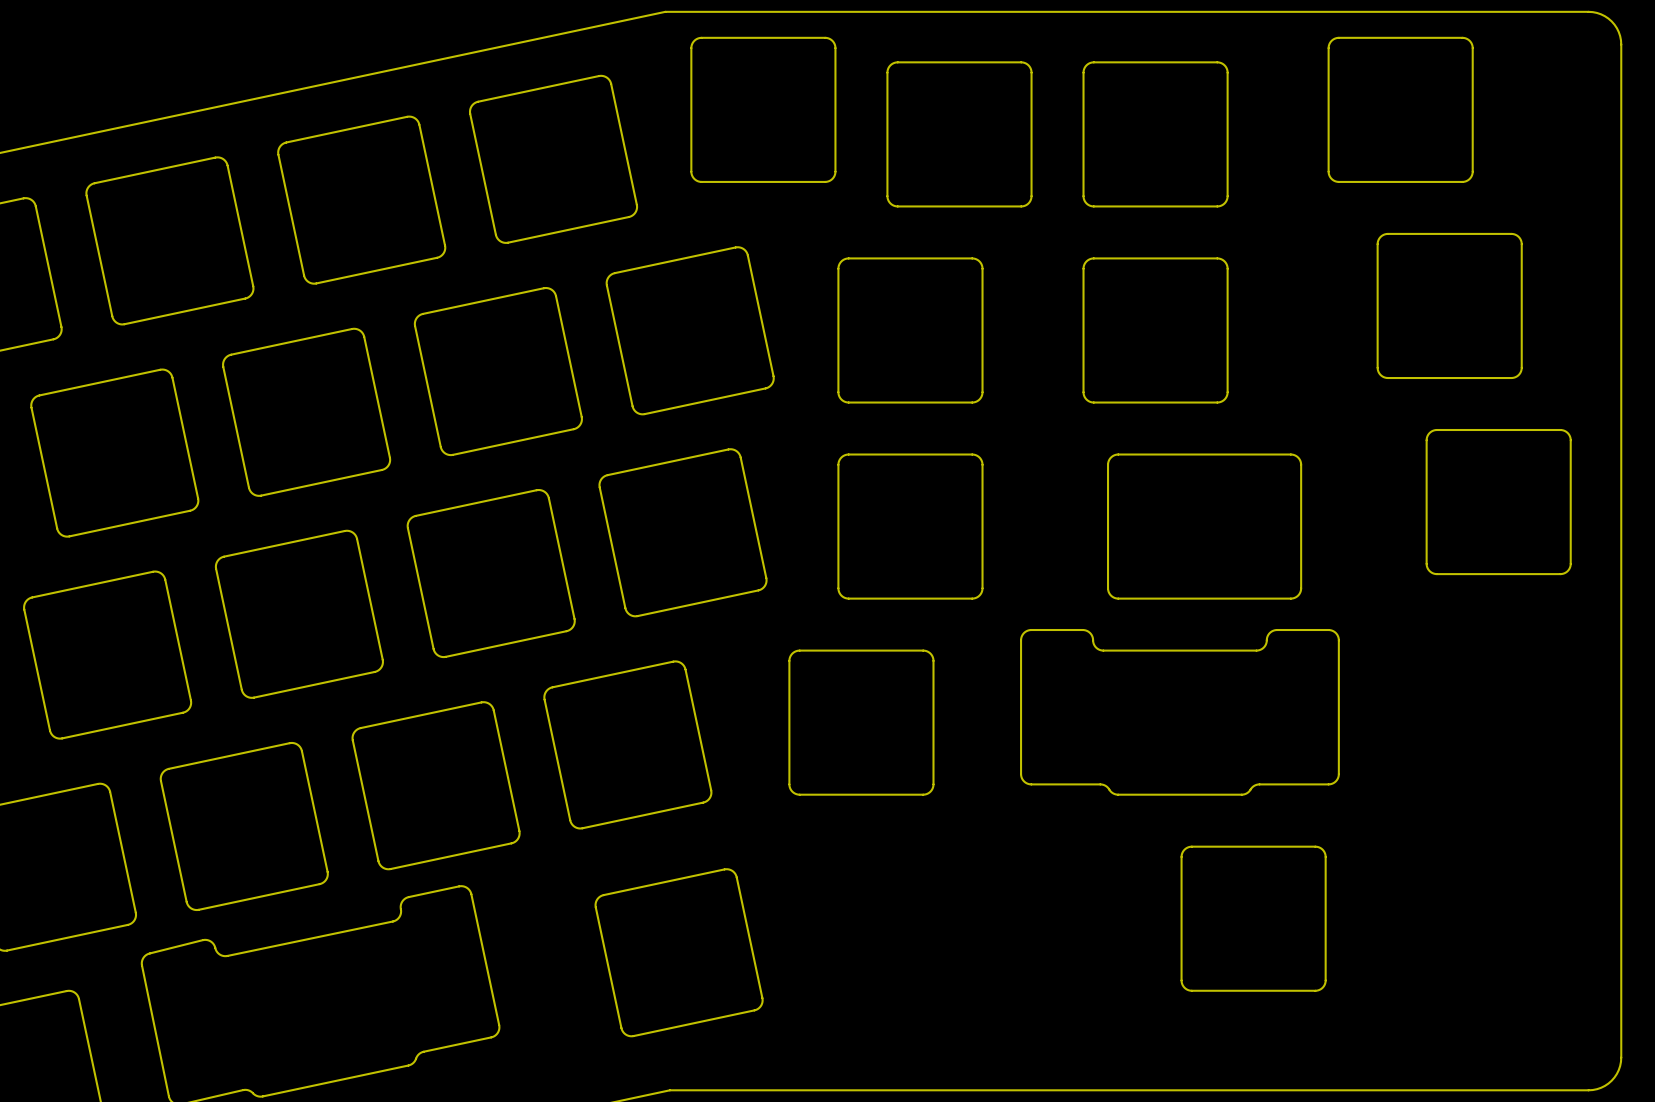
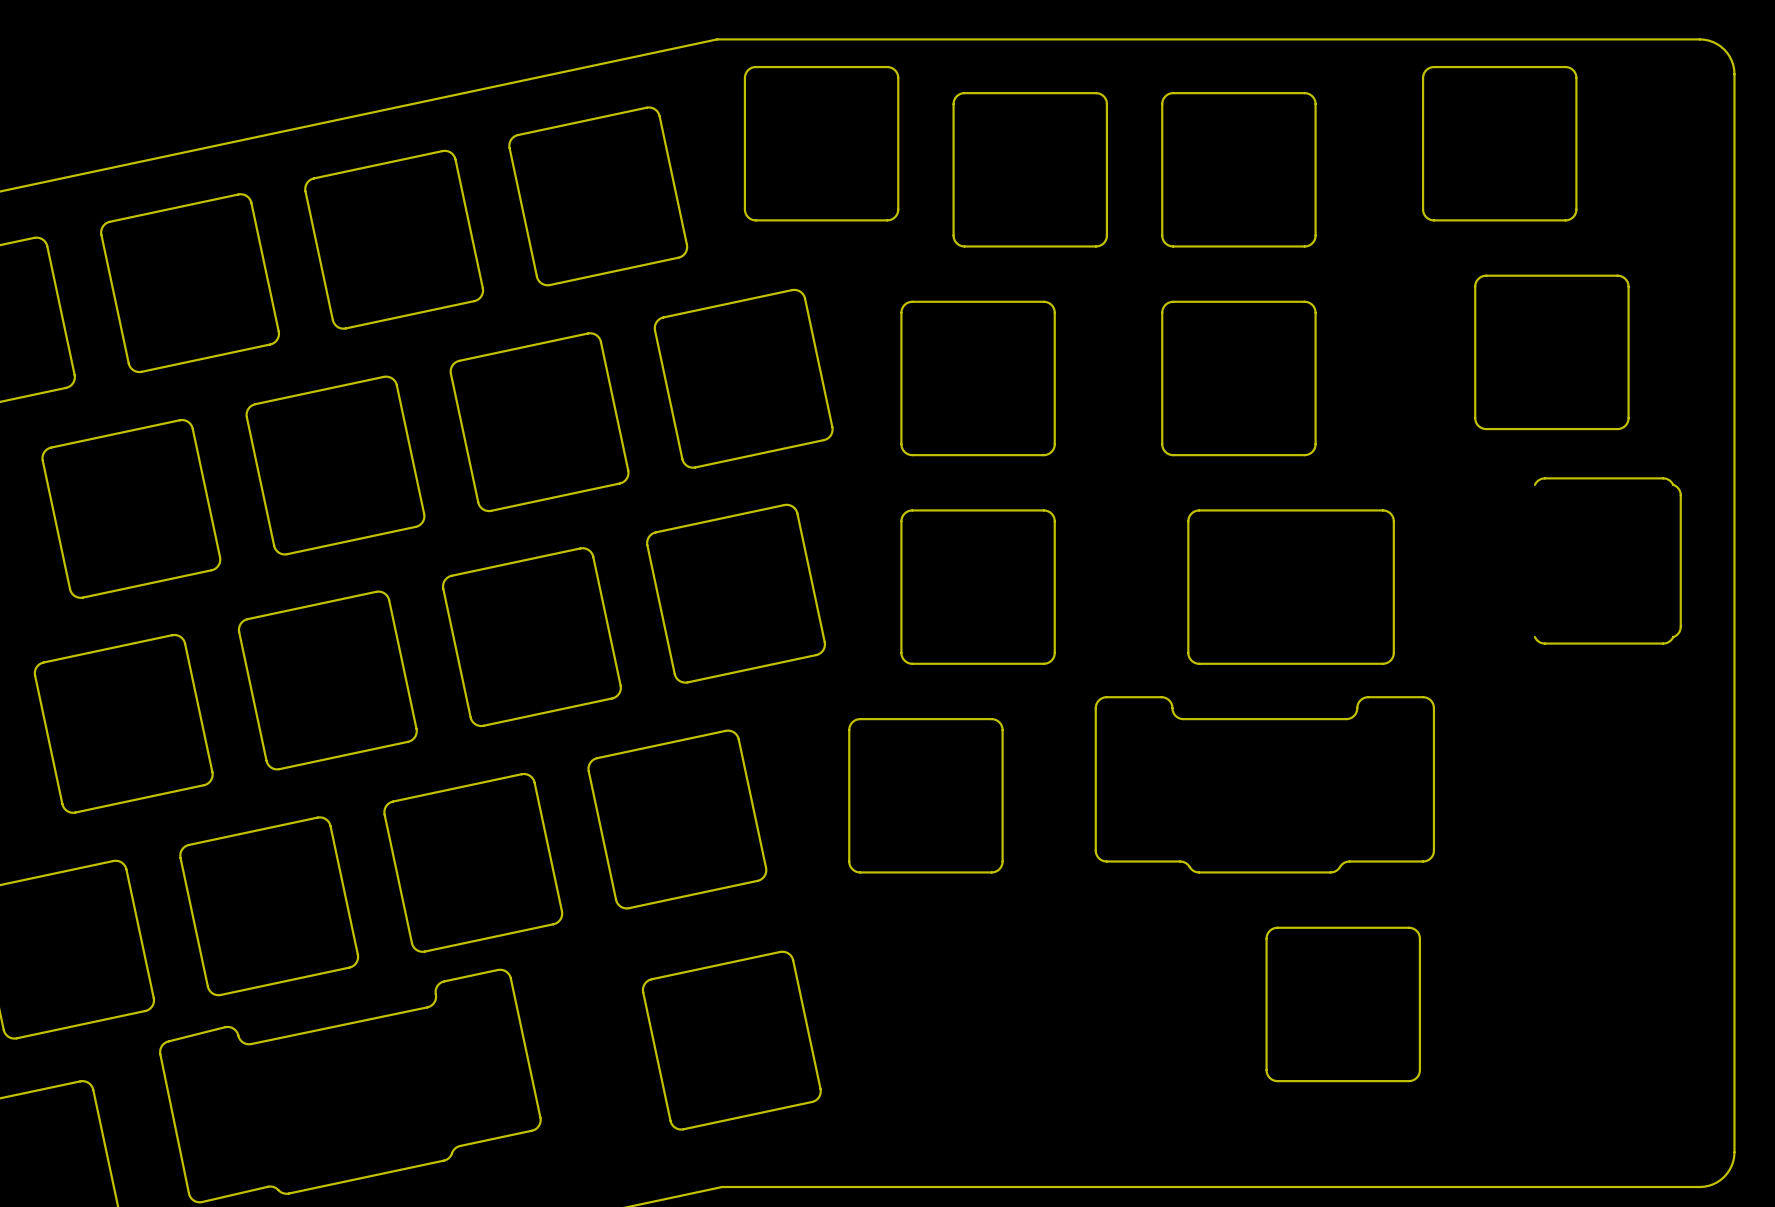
board edge: none -> (1534, 484) (1538, 480) (1544, 478) (1664, 478) (1677, 487) (1680, 495) (1680, 626) (1677, 634) (1669, 641) (1663, 643) (1544, 643) (1538, 641) (1534, 637)
board edge: (1560, 430) (1436, 430) (1429, 433) (1426, 440) (1426, 563) (1429, 571) (1436, 574) (1560, 574) (1567, 571) (1570, 563) (1570, 440) (1567, 433) (1560, 430) -> none

